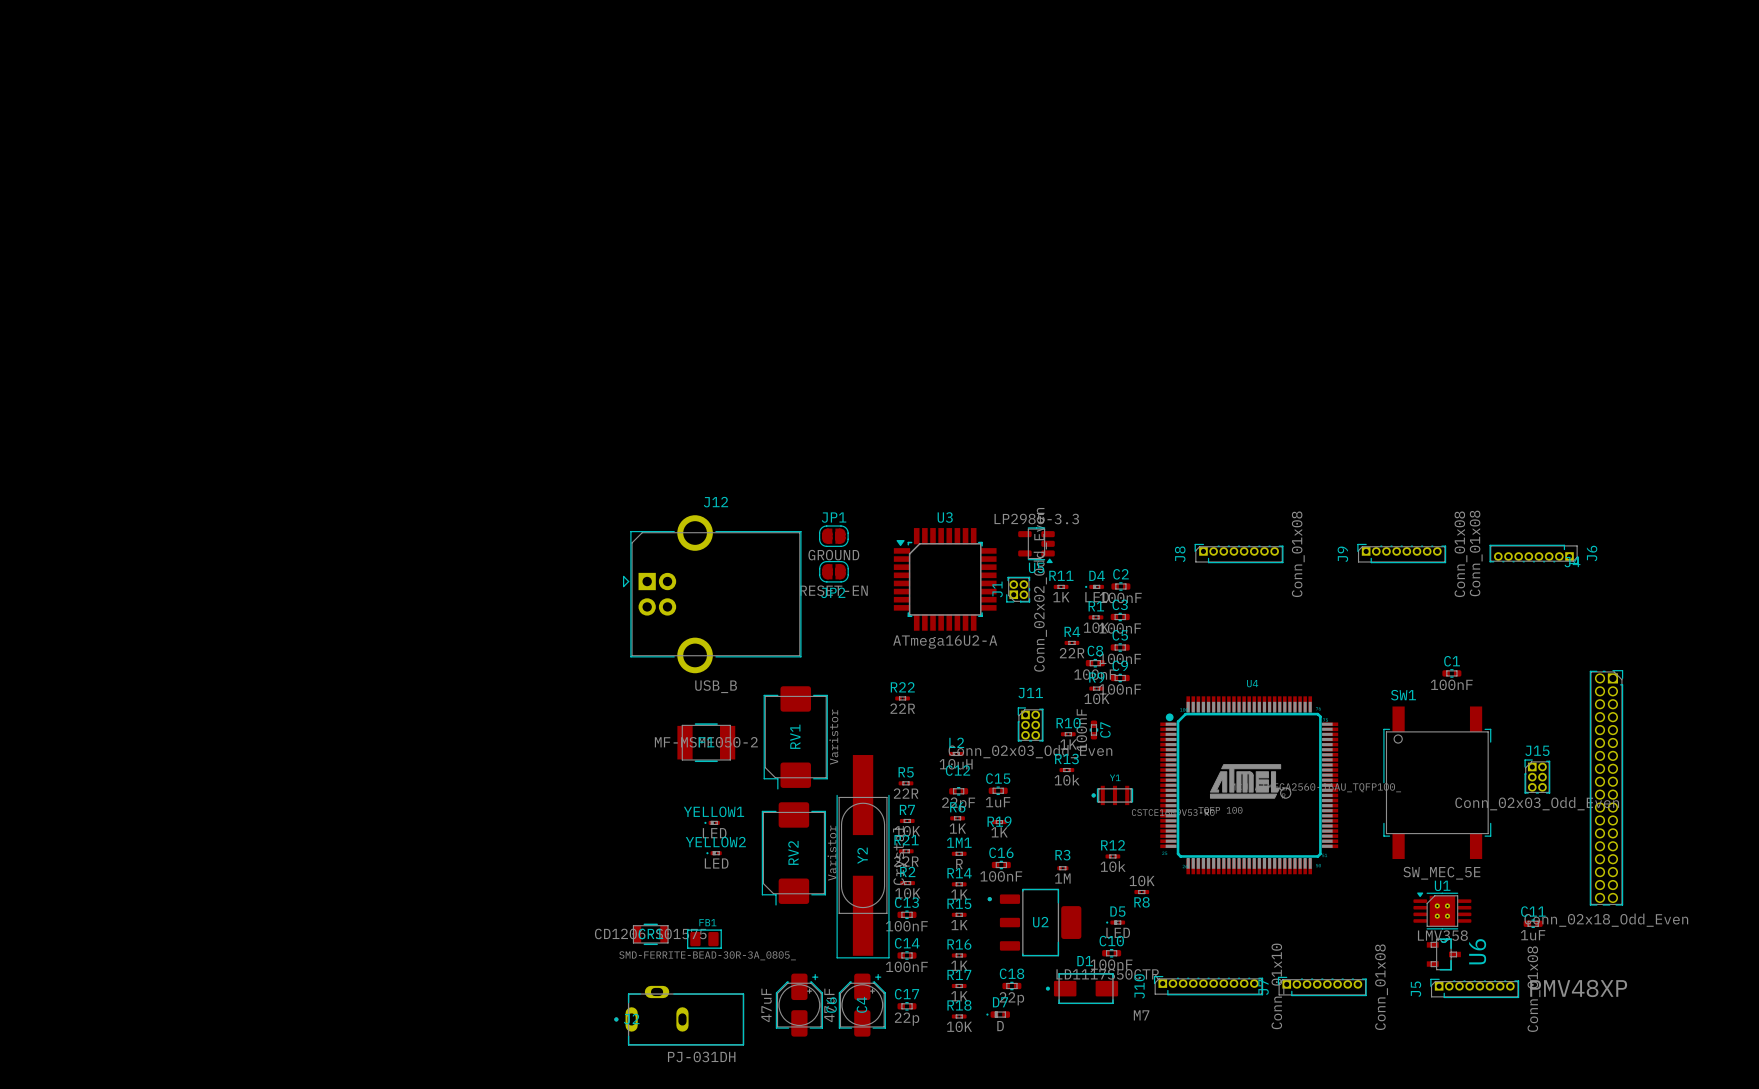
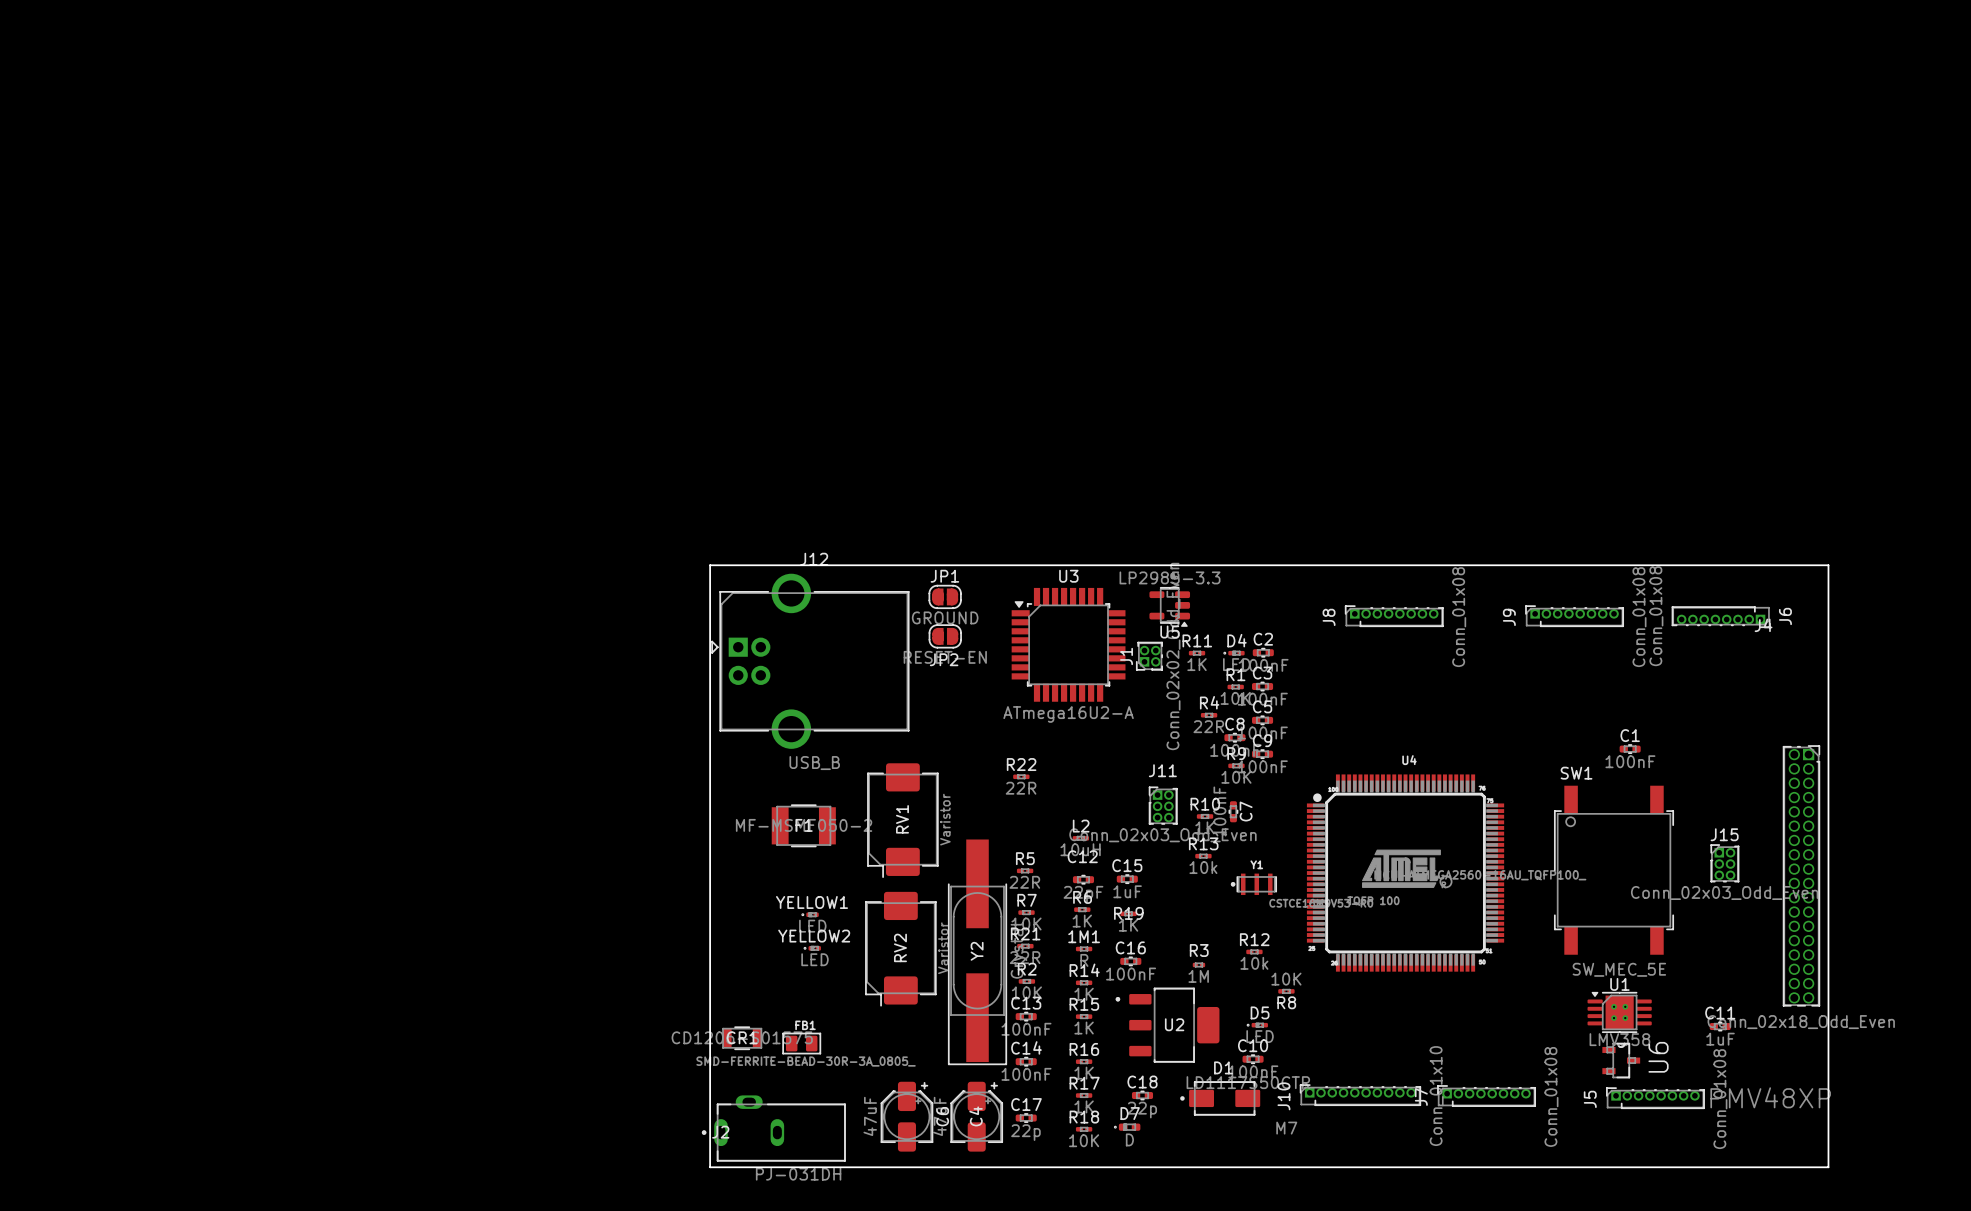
board edge: none -> (710, 565) (1828, 565) (1828, 1167) (710, 1167) (710, 565)

